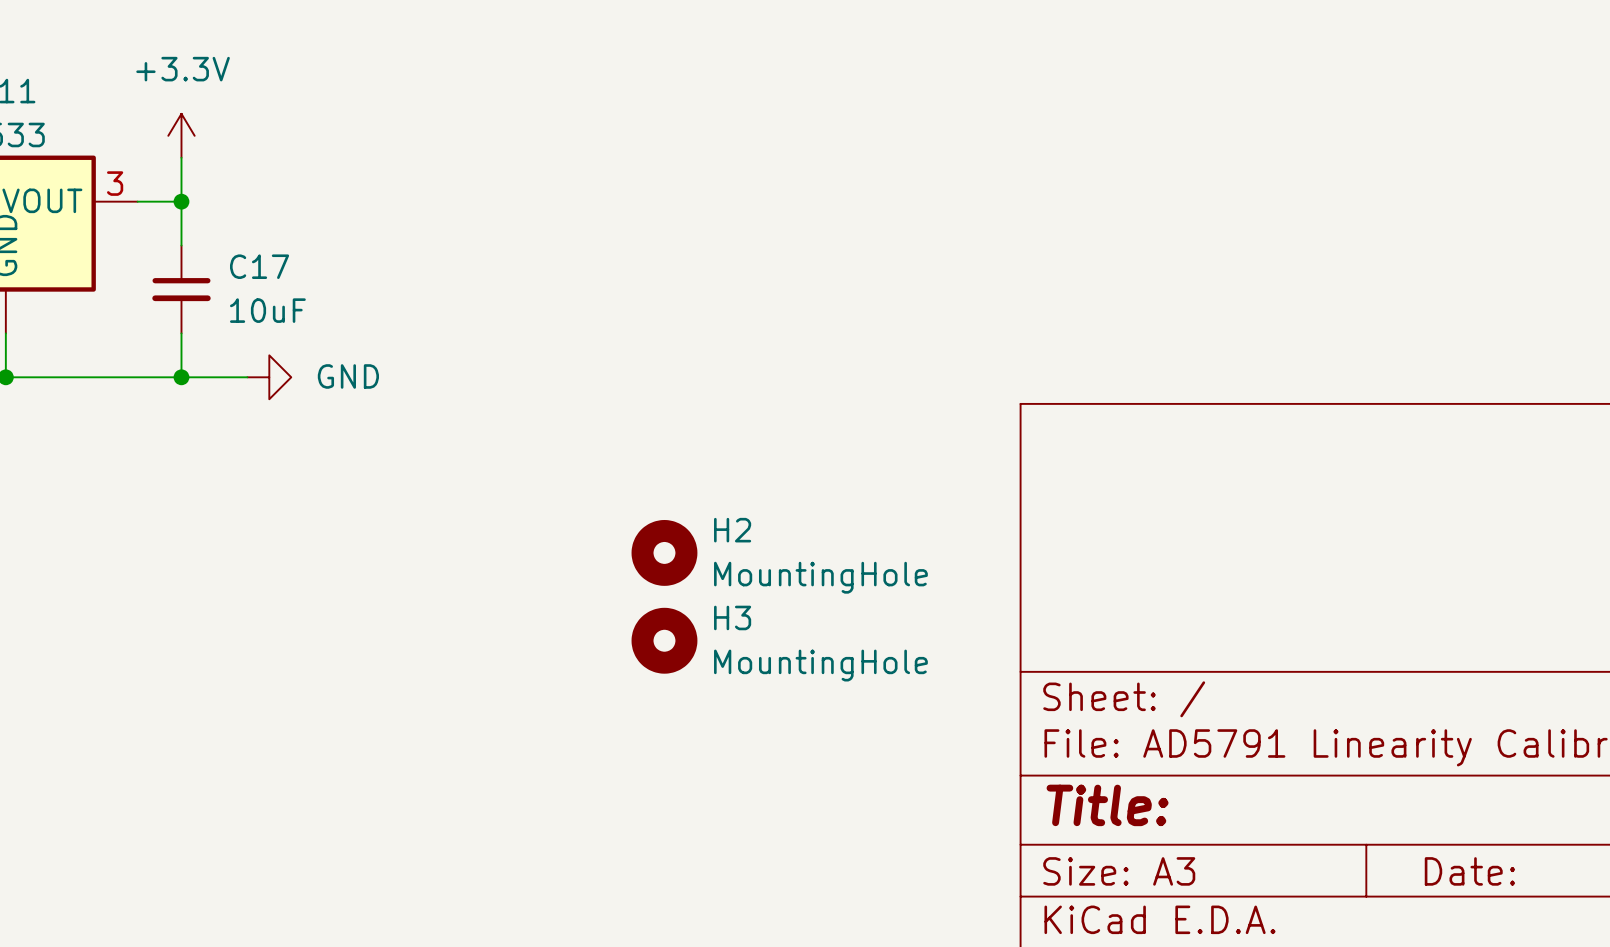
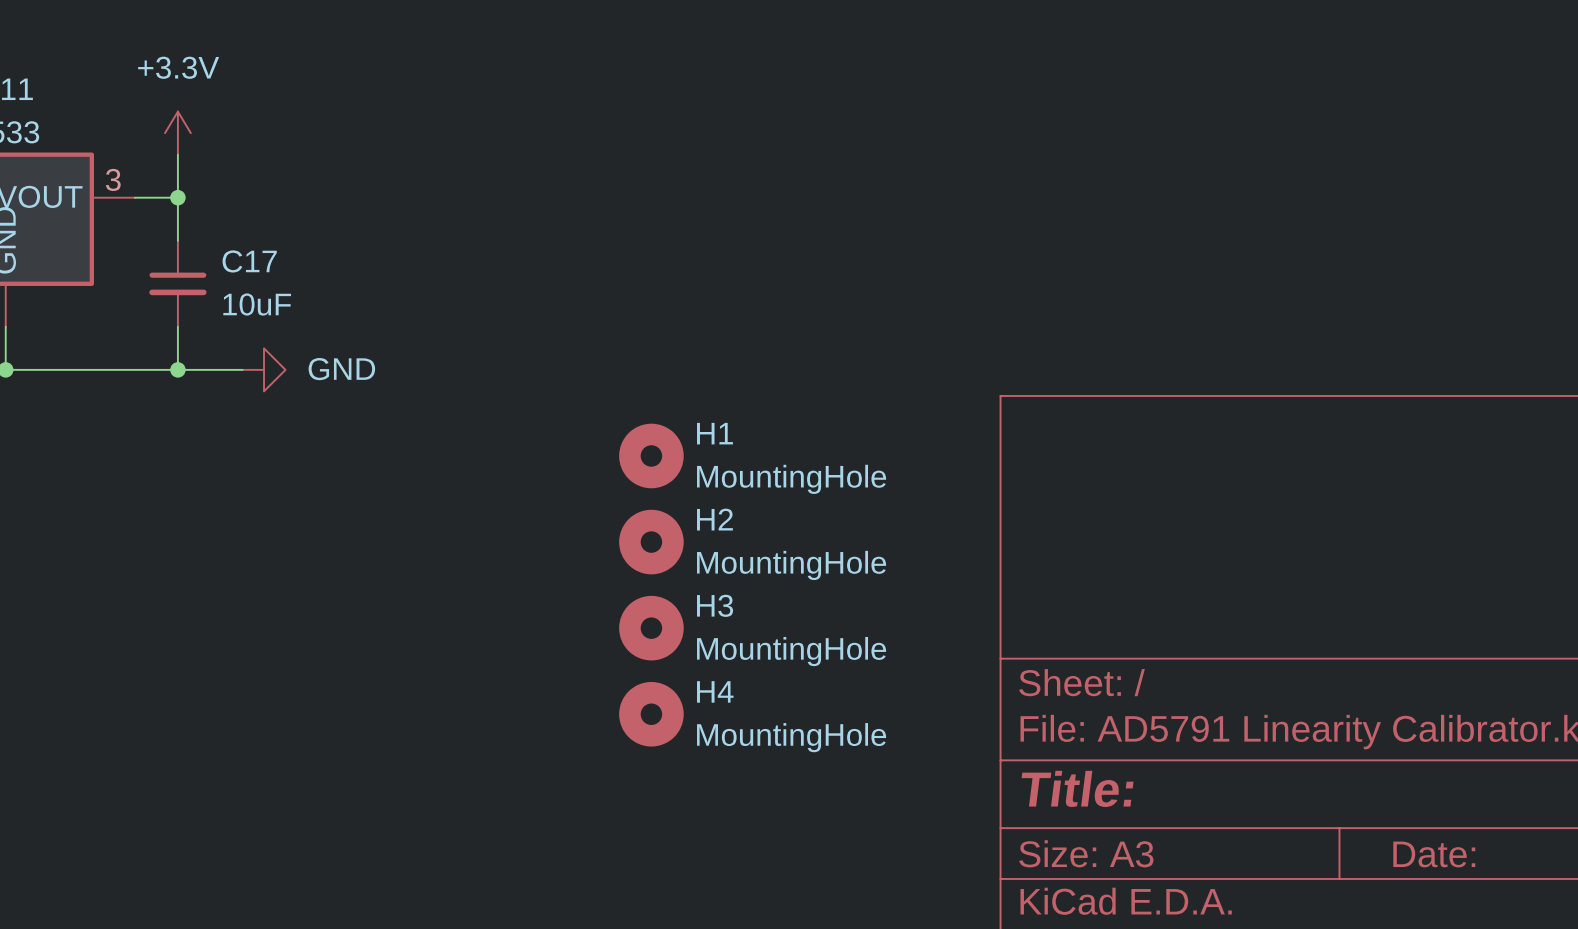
H1: none -> MountingHole (651, 455)
H4: none -> MountingHole (651, 714)

